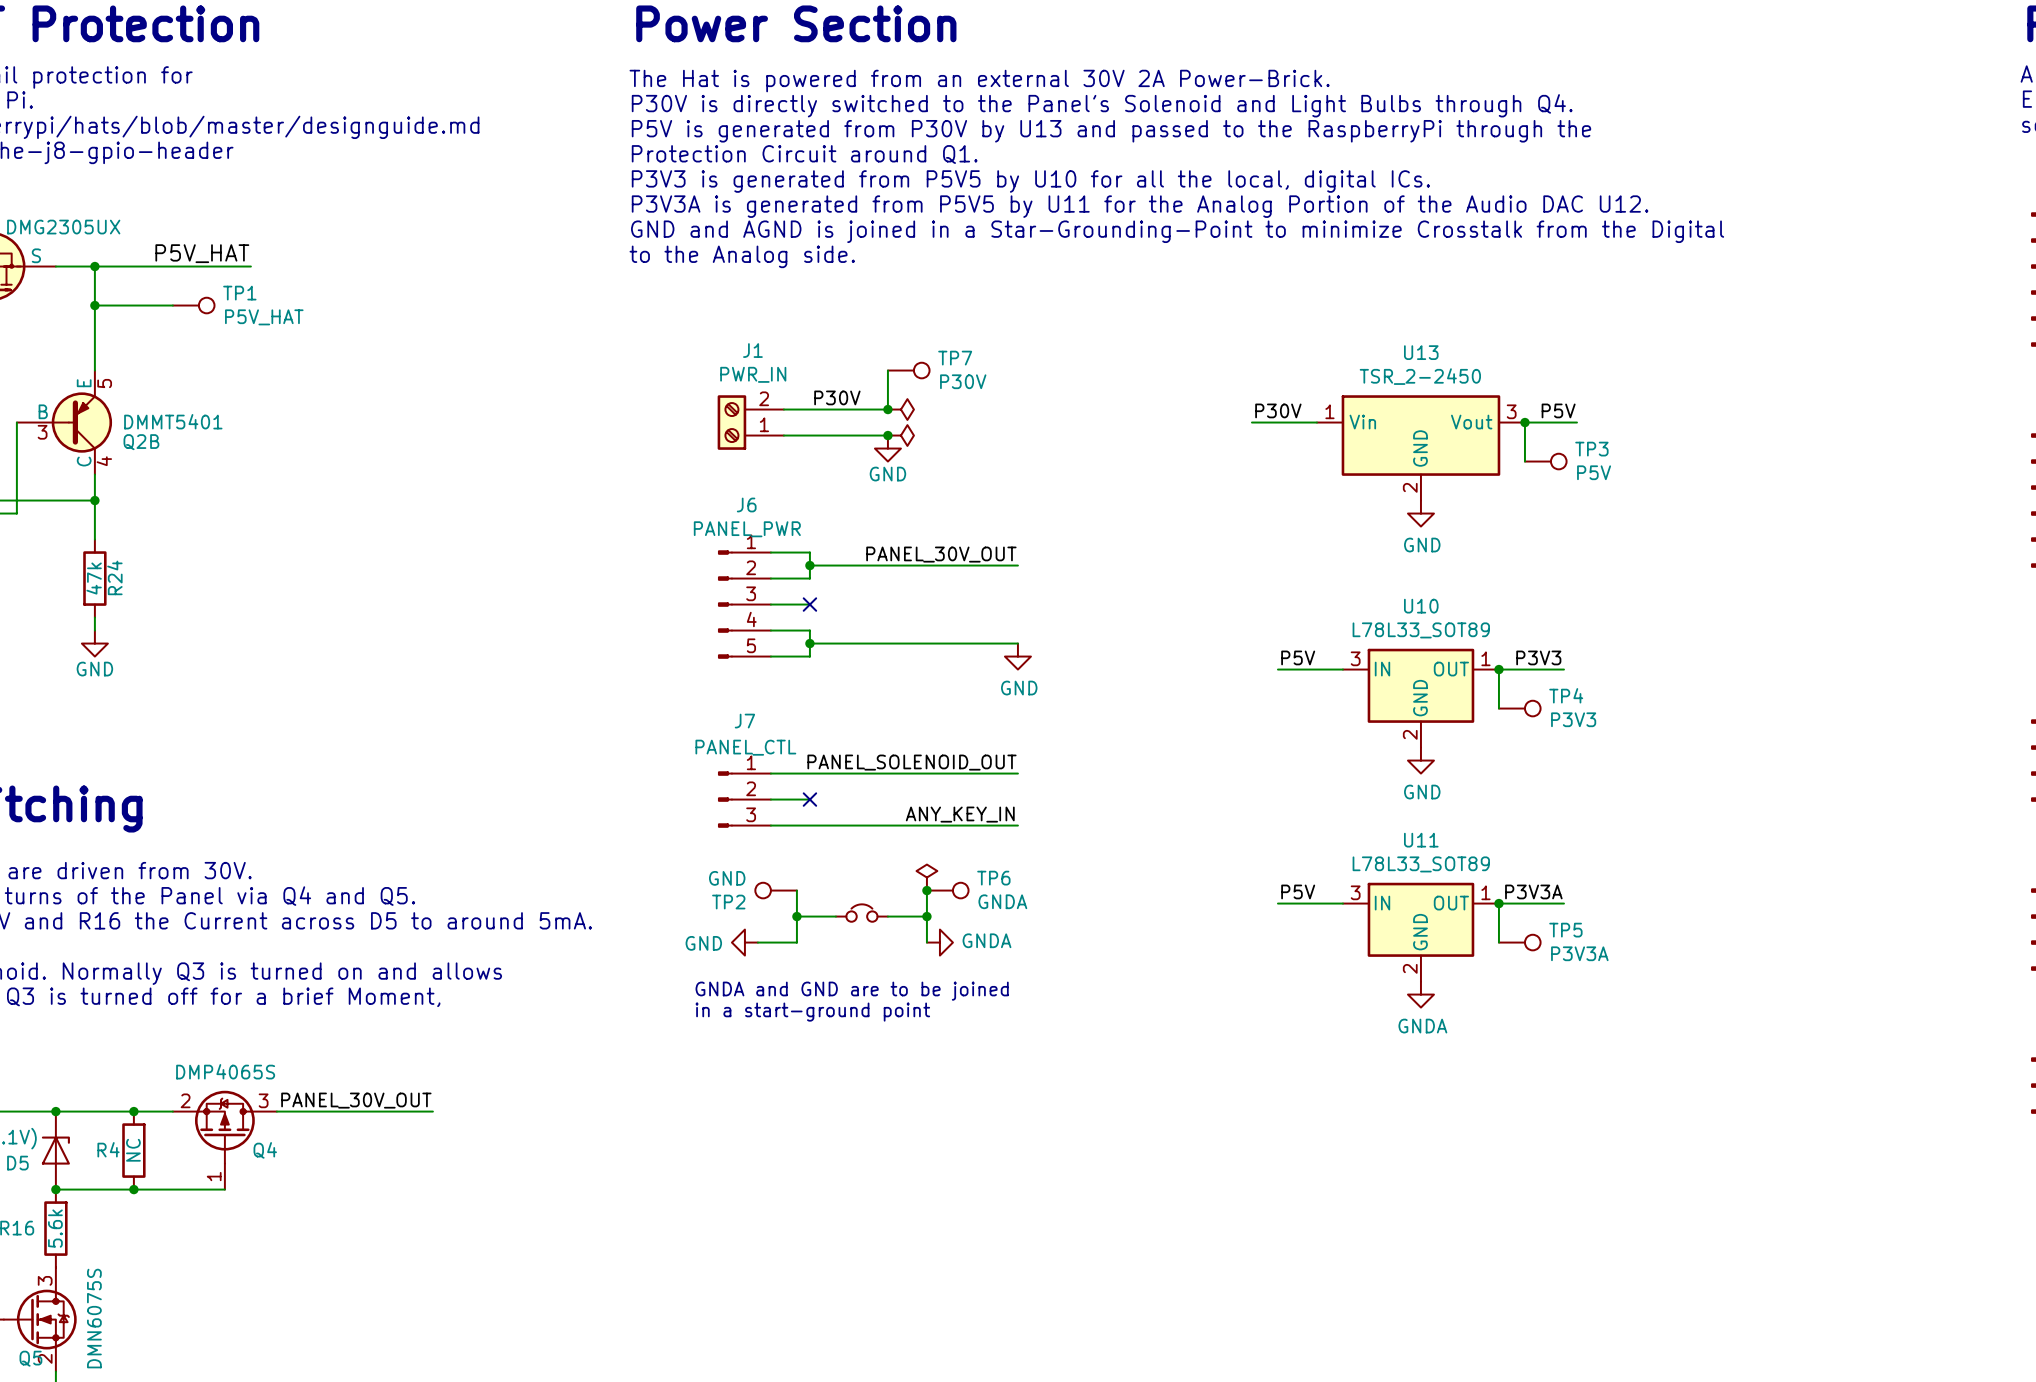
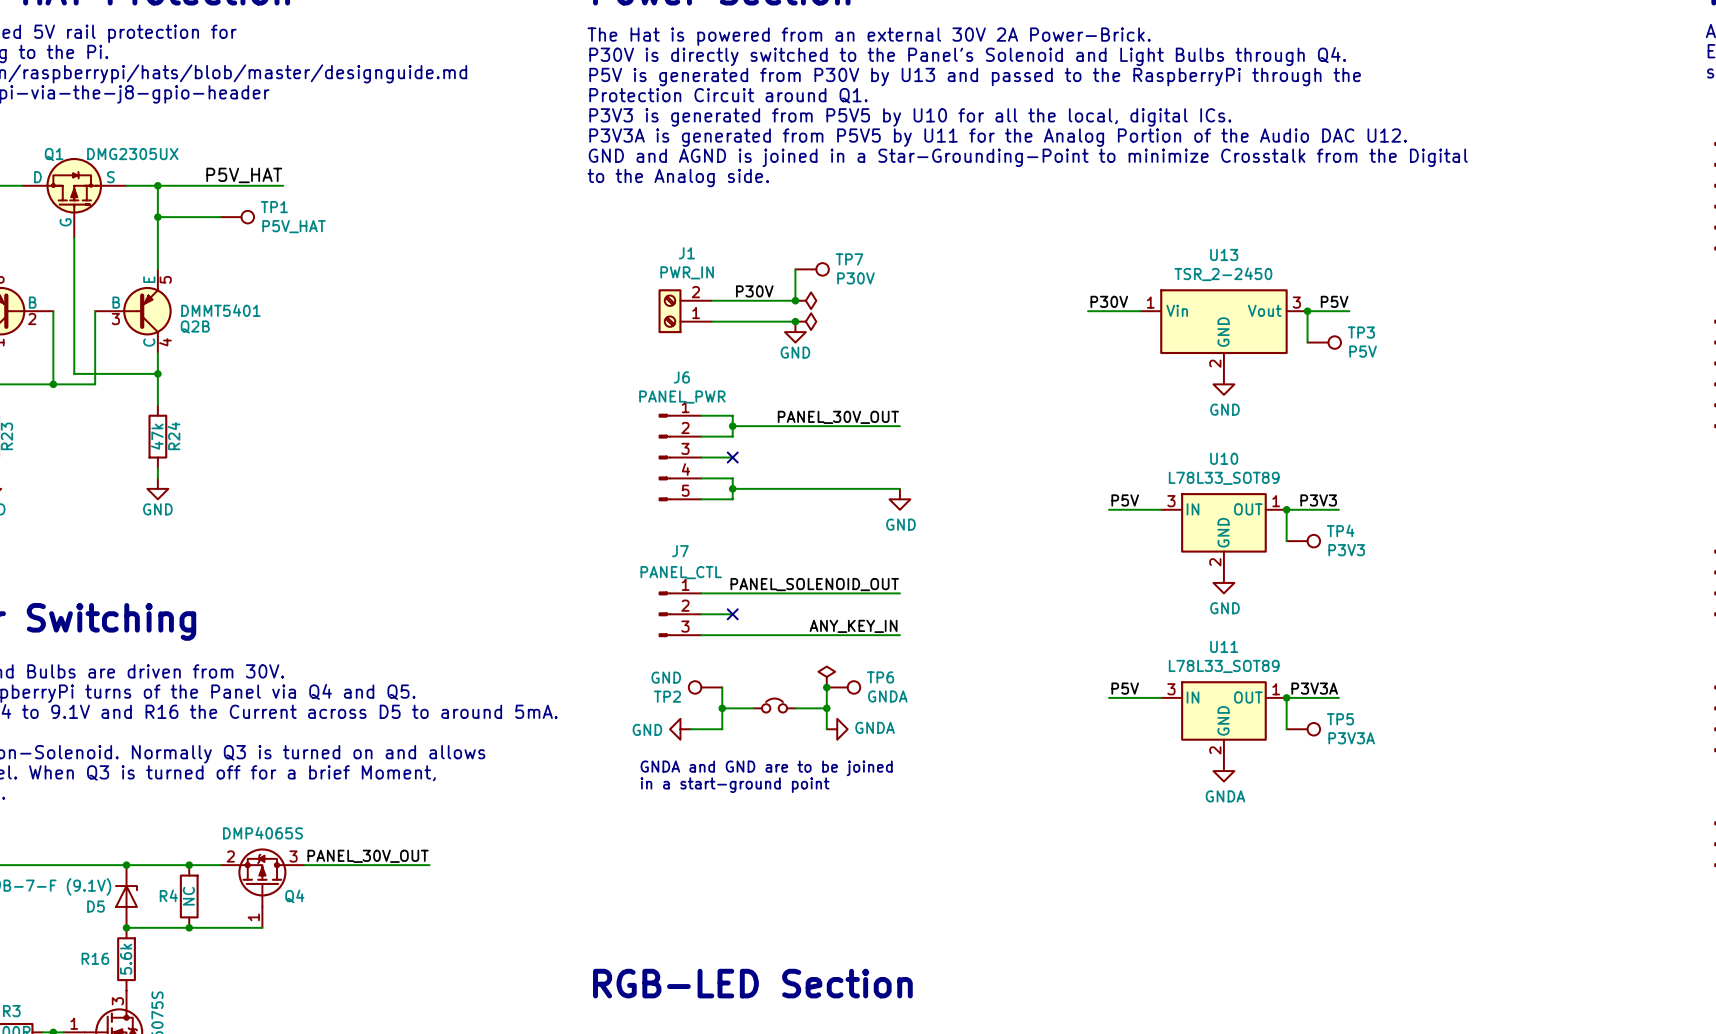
text: none -> RGB-LED Section (752, 983)

